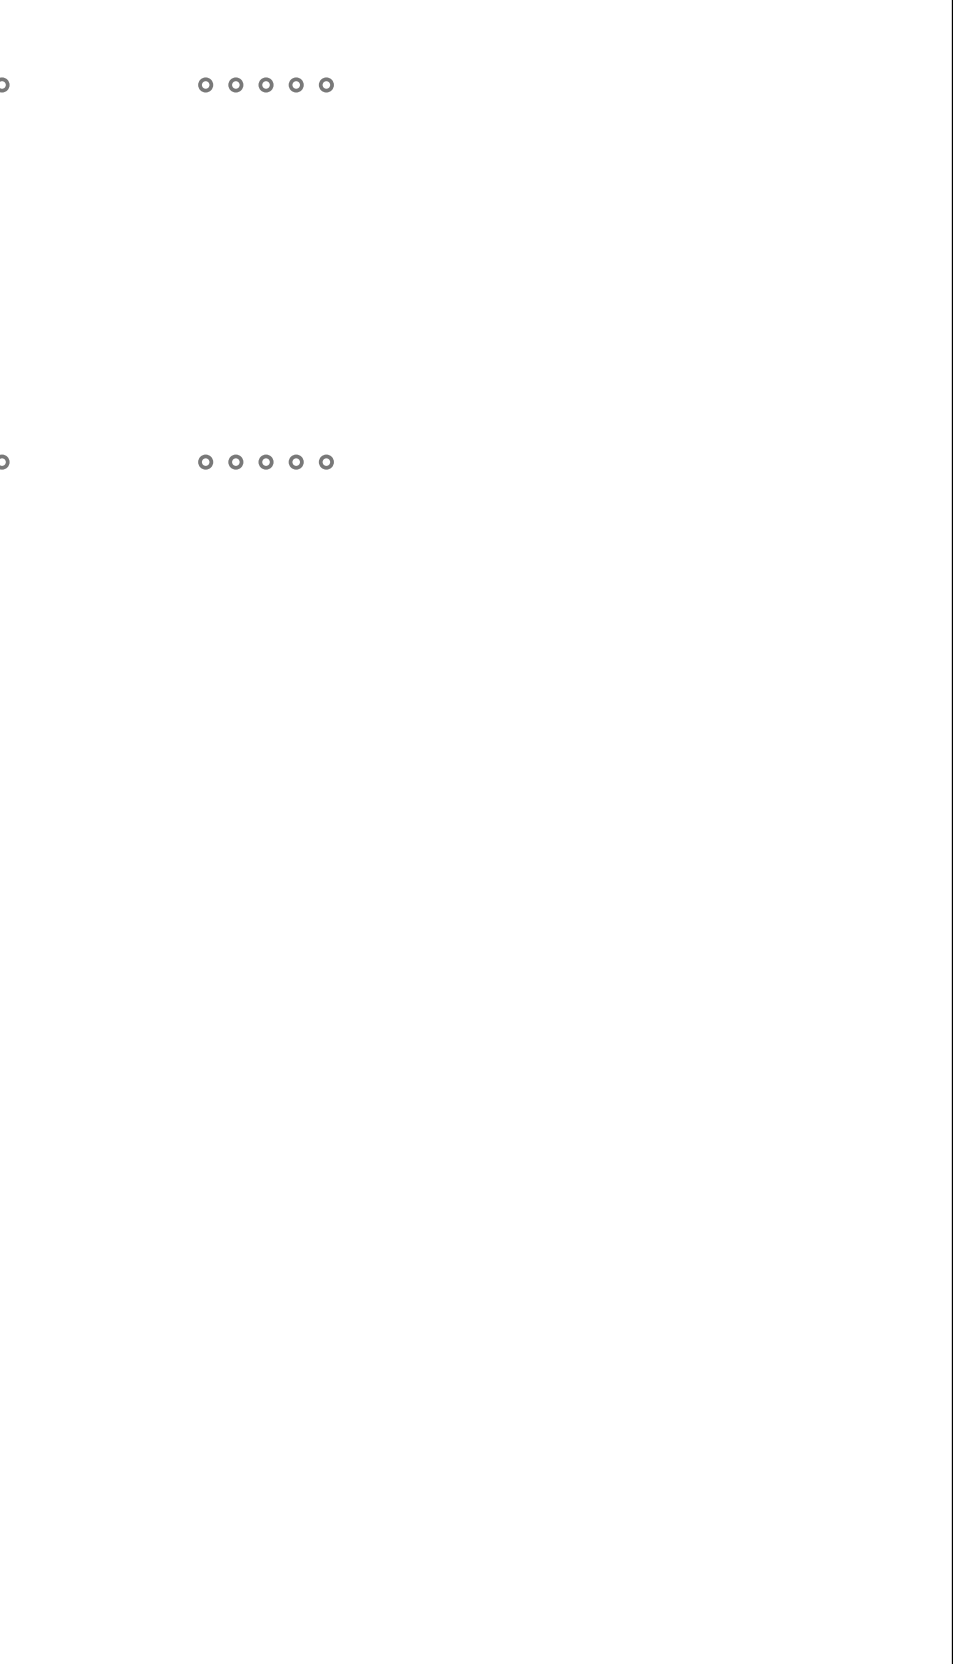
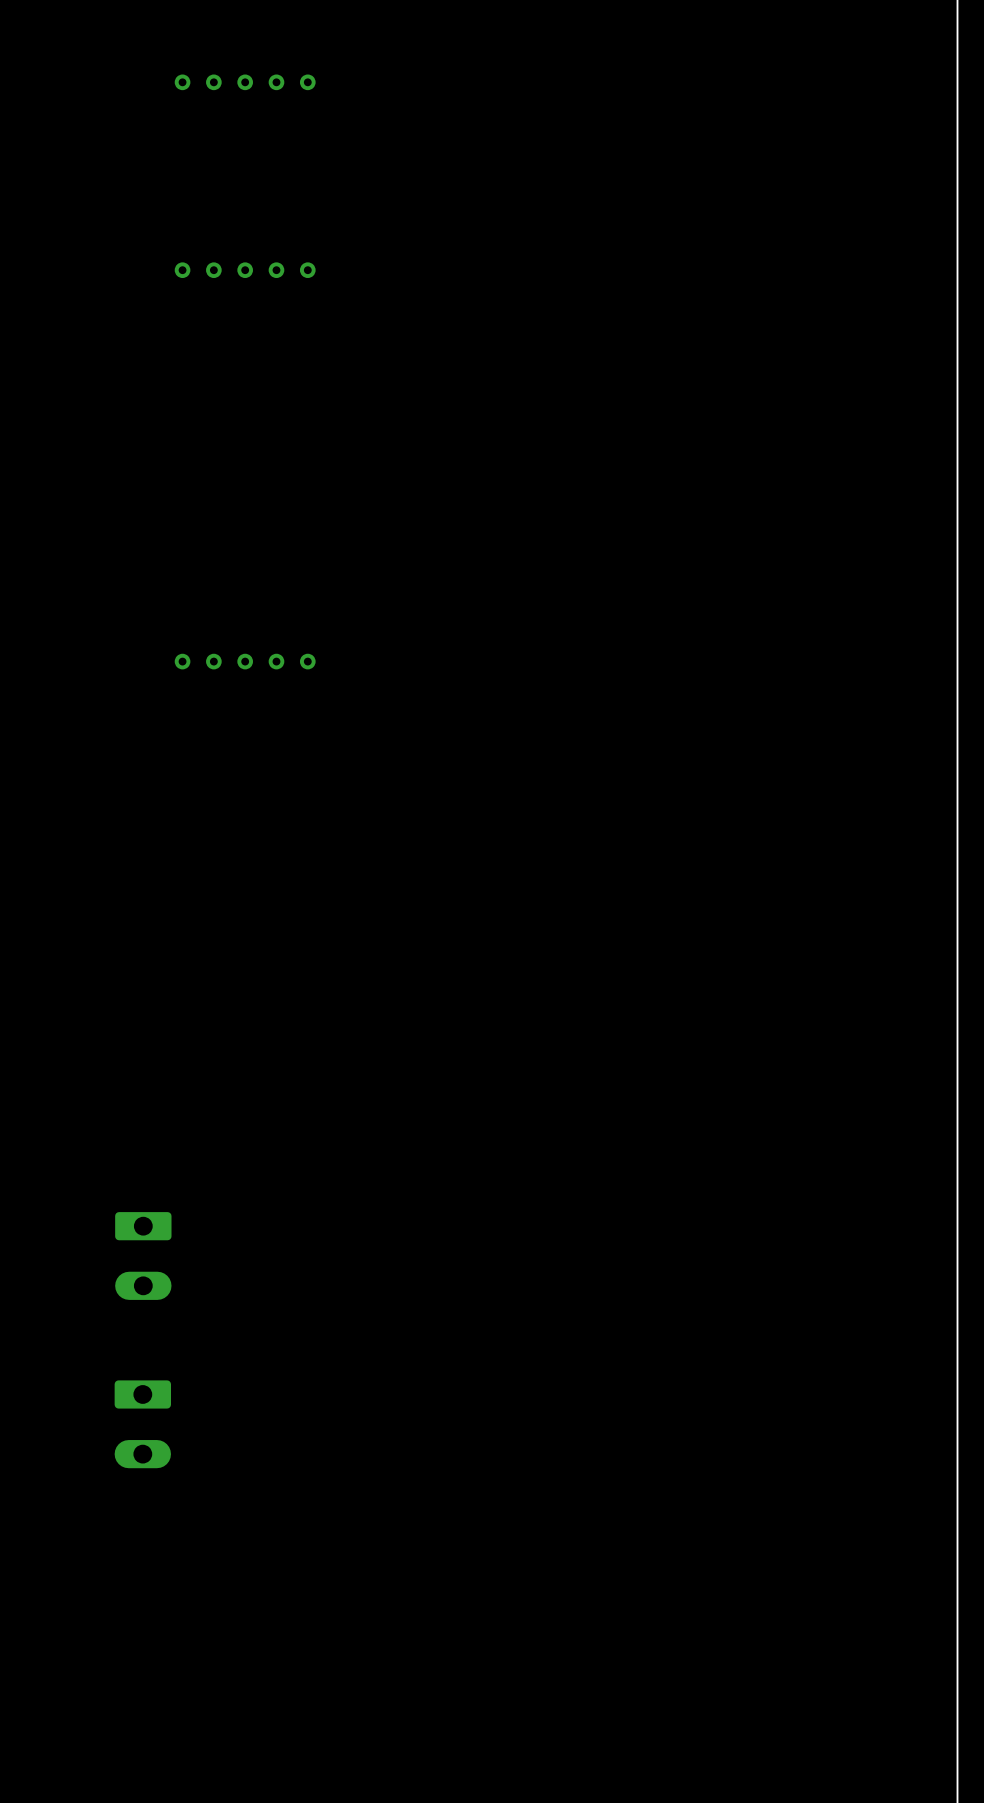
part: none -> (143, 1256)
part: none -> (142, 1424)

